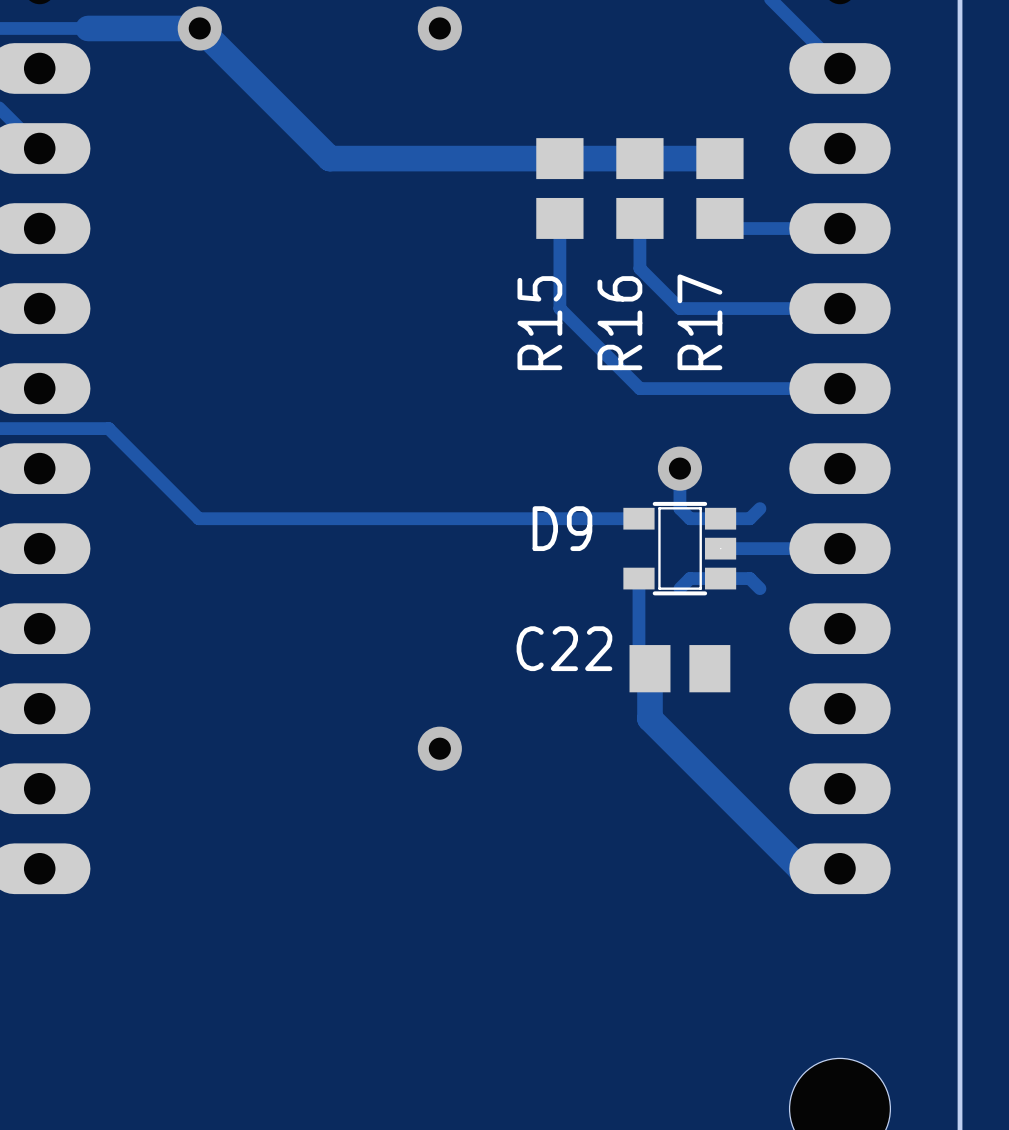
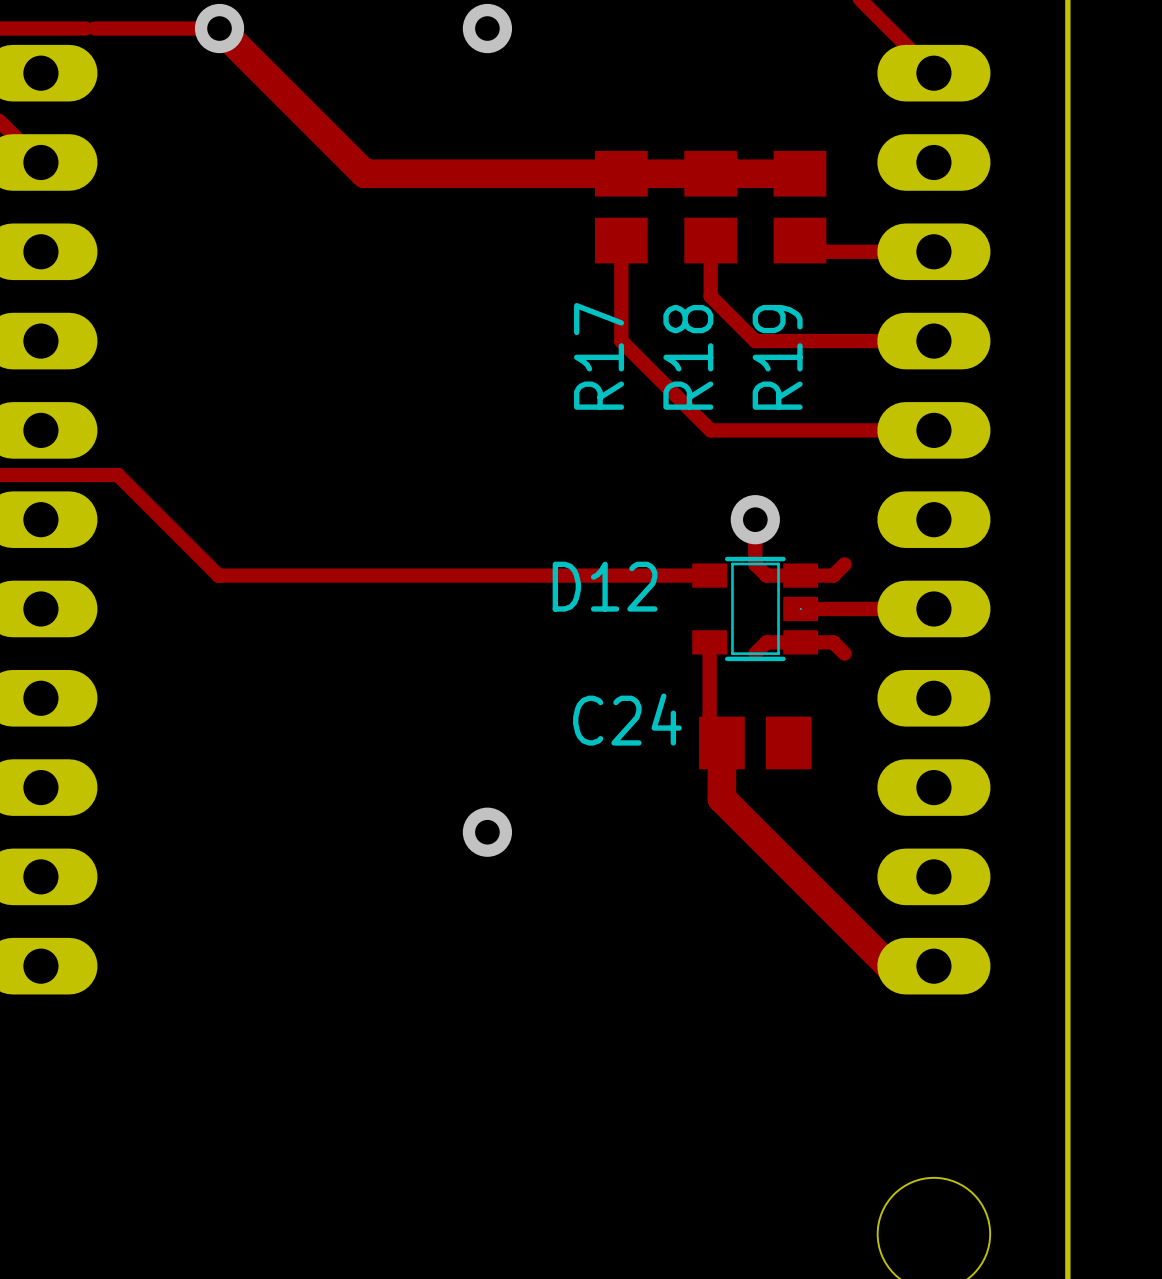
track width: thick (88, 28) (199, 28) -> thin (94, 28) (219, 28)
R17 name: R17 (699, 322) -> R19 (777, 357)
R15 name: R15 (539, 323) -> R17 (599, 356)
R16 name: R16 (619, 323) -> R18 (688, 357)
D9 name: D9 (562, 528) -> D12 (605, 586)
C22 name: C22 (564, 648) -> C24 (627, 719)

